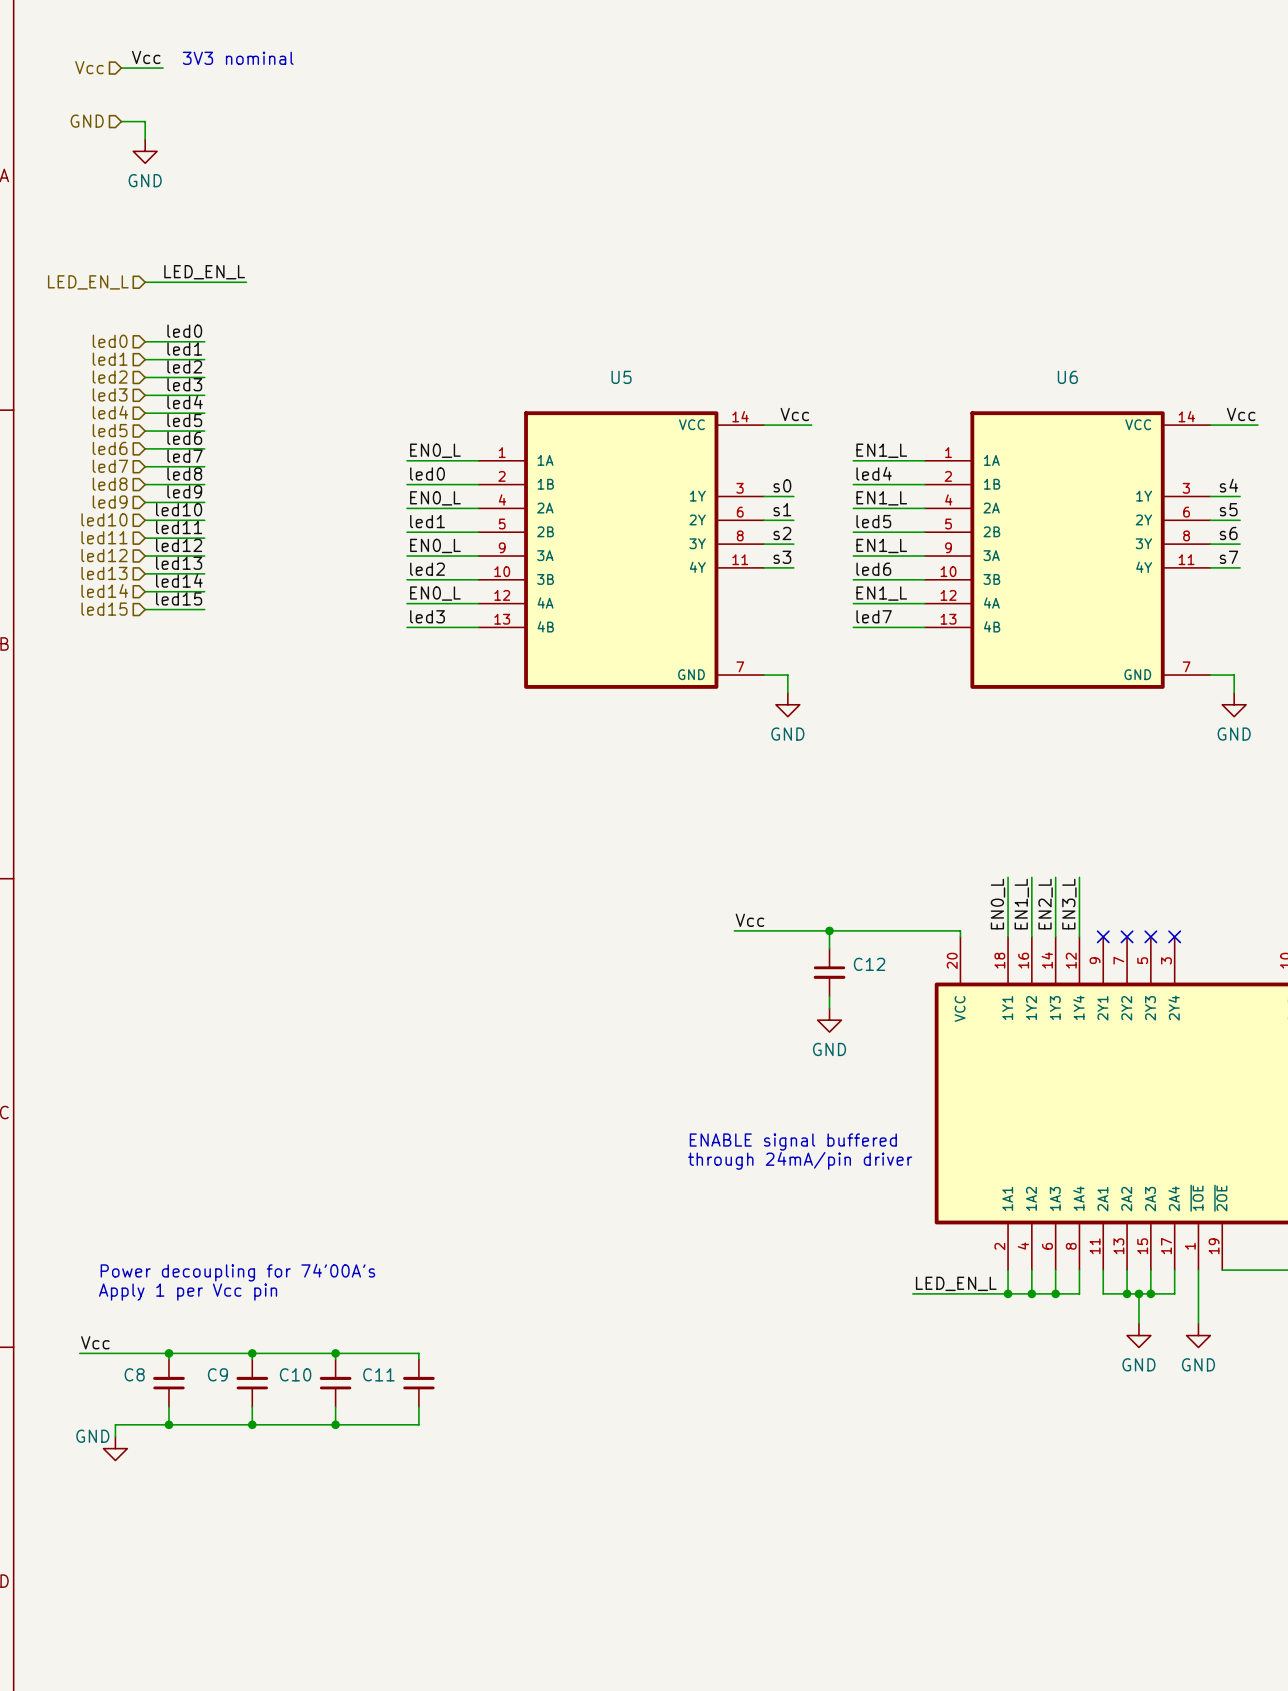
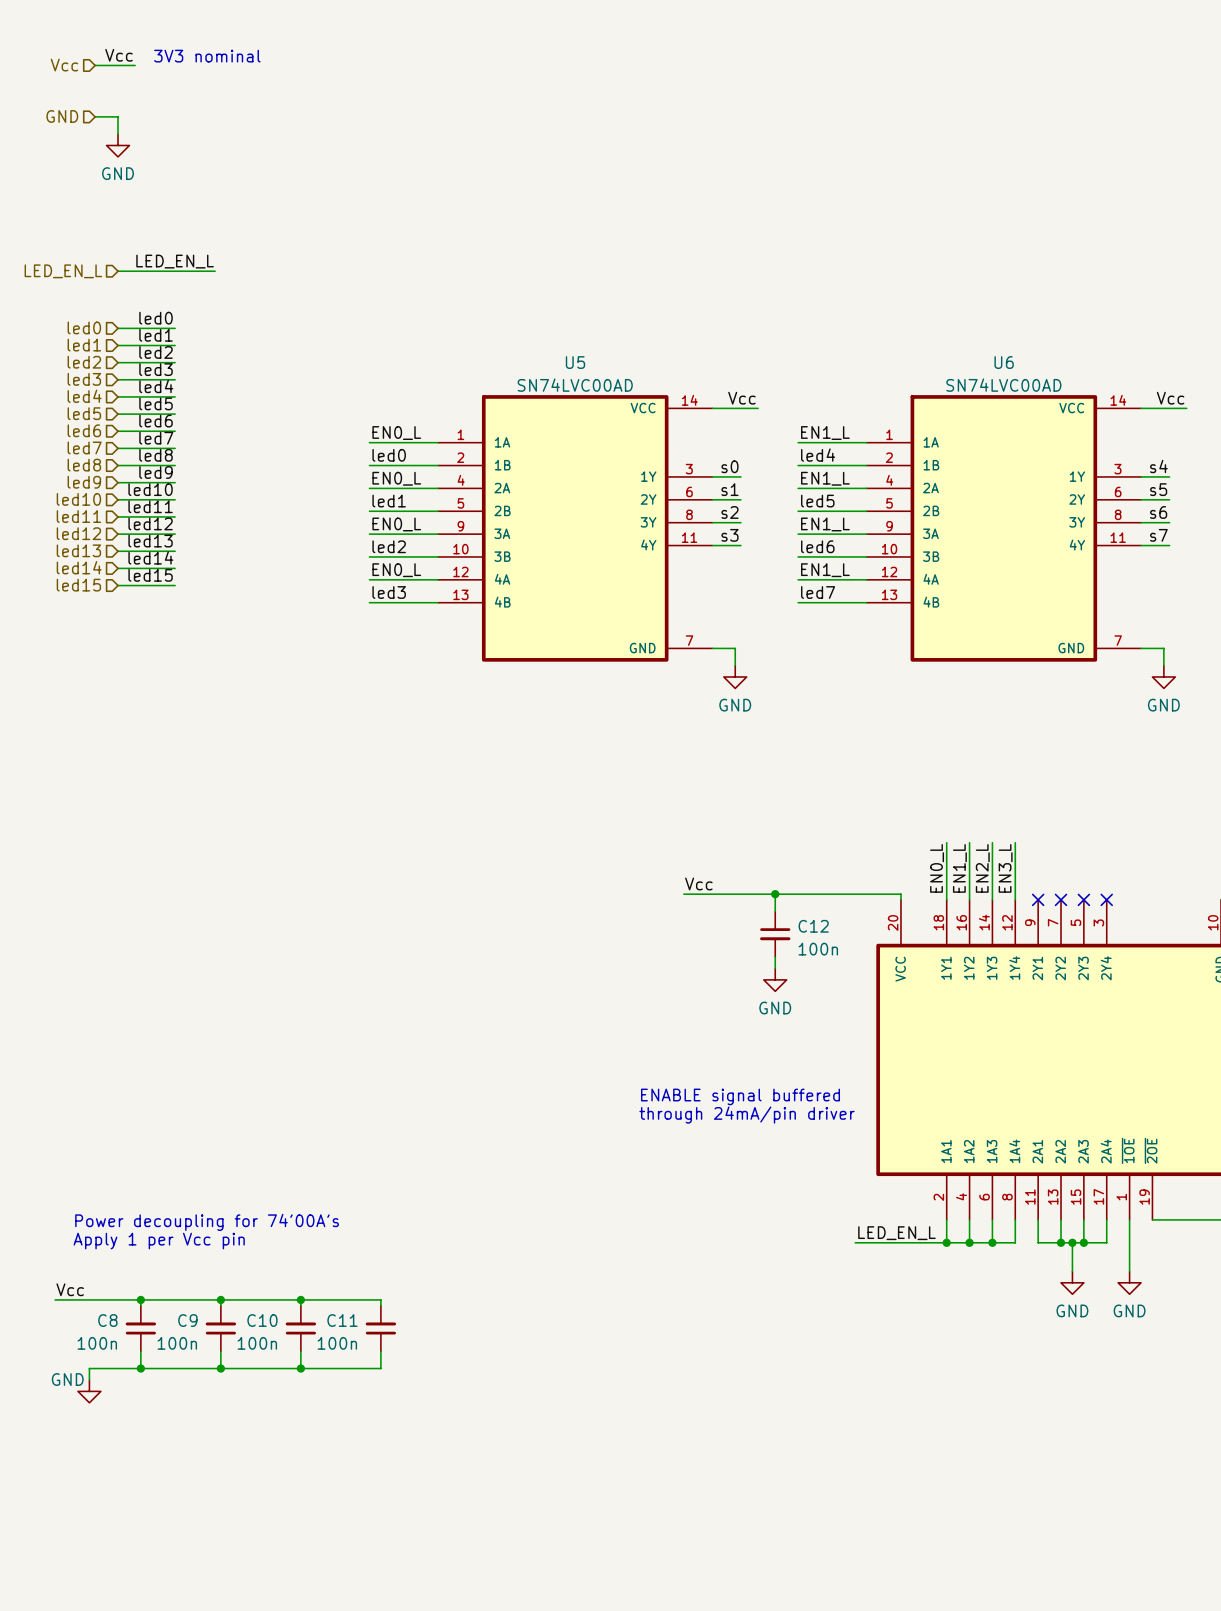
U5 value: none -> SN74LVC00AD (575, 385)
U6 value: none -> SN74LVC00AD (1003, 385)
C12 value: none -> 100n (818, 949)
C8 value: none -> 100n (97, 1343)
C9 value: none -> 100n (177, 1343)
C10 value: none -> 100n (257, 1343)
C11 value: none -> 100n (337, 1343)

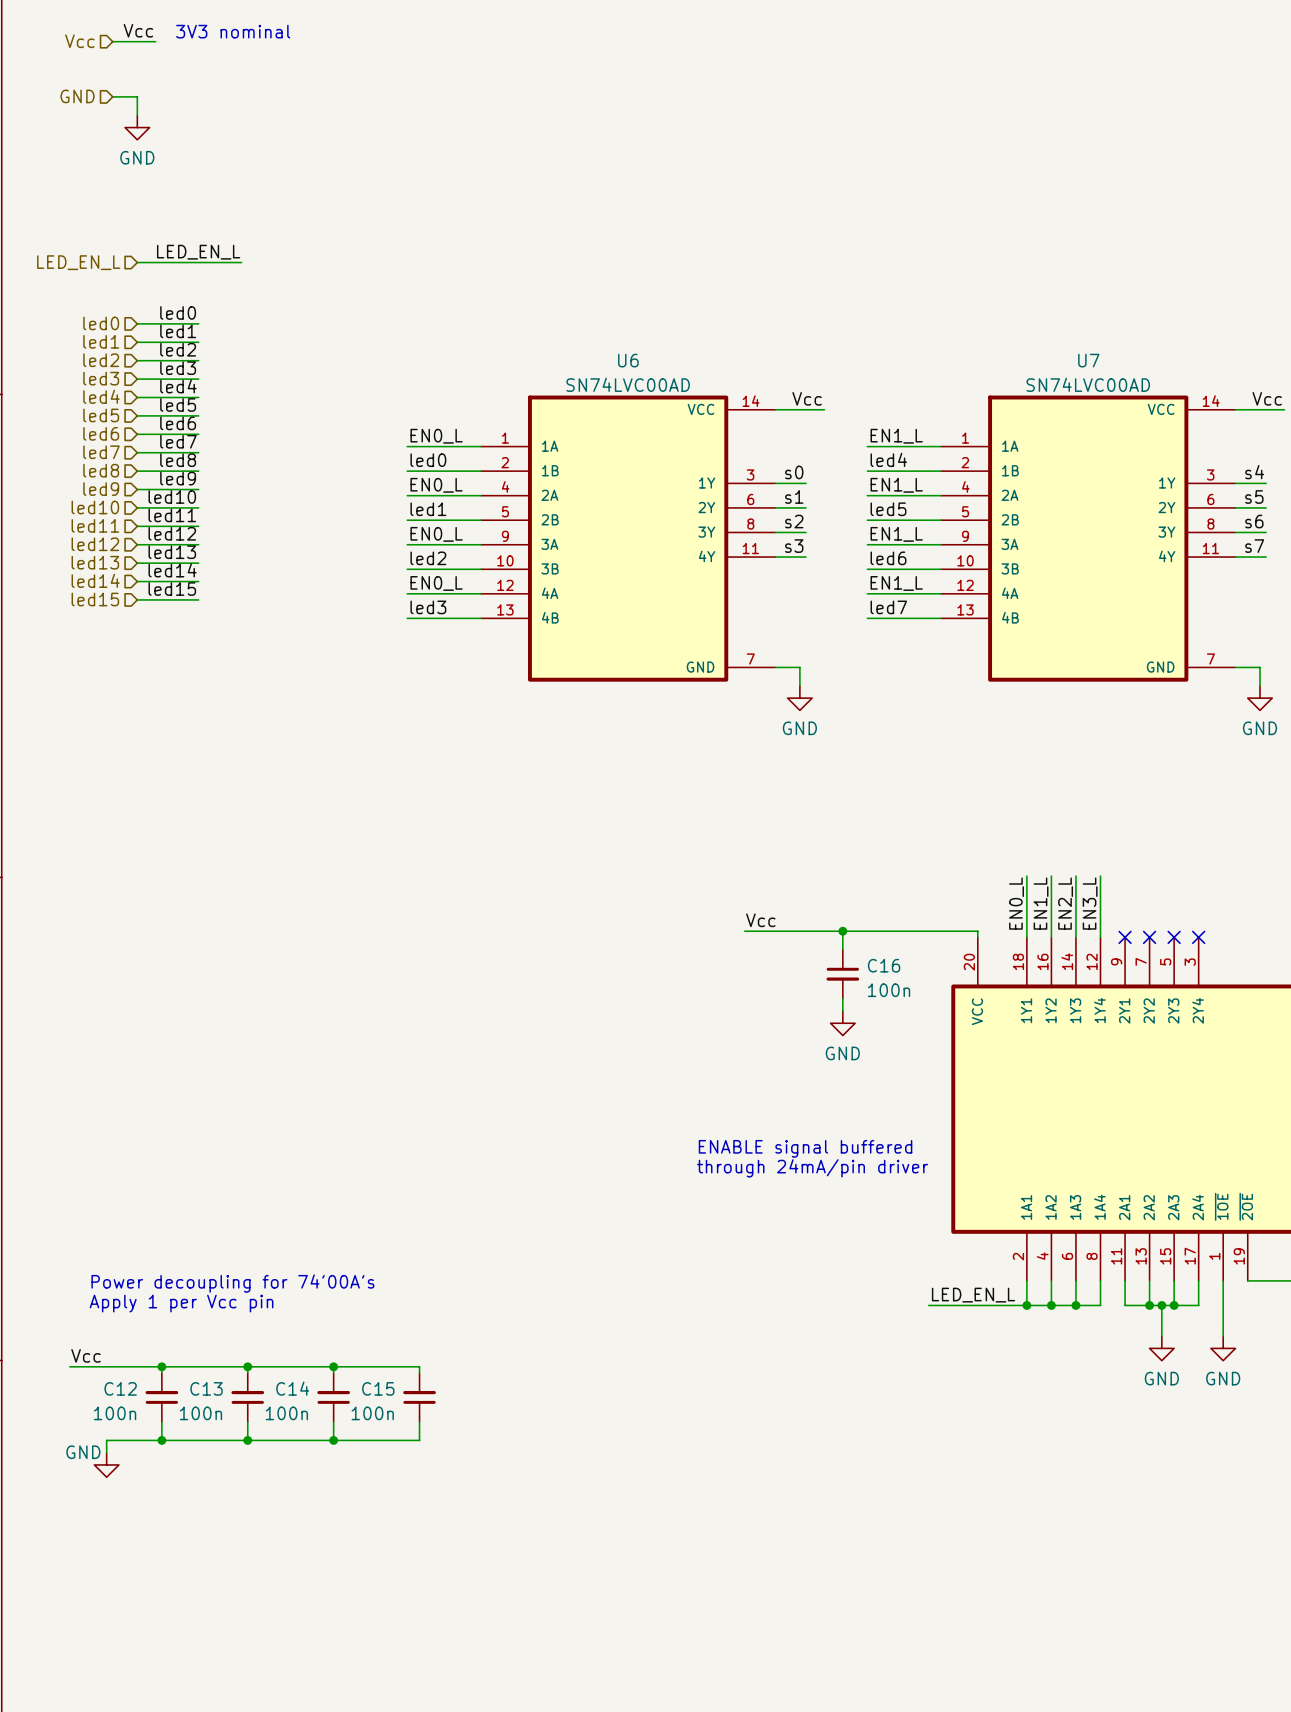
U5 name: U5 (575, 362) -> U6 (628, 360)
U6 name: U6 (1004, 362) -> U7 (1088, 360)
C12 name: C12 (813, 926) -> C16 (884, 965)
C8 name: C8 (107, 1320) -> C12 (120, 1388)
C9 name: C9 (187, 1320) -> C13 (206, 1388)
C10 name: C10 (262, 1320) -> C14 (292, 1388)
C11 name: C11 (342, 1320) -> C15 (378, 1388)

